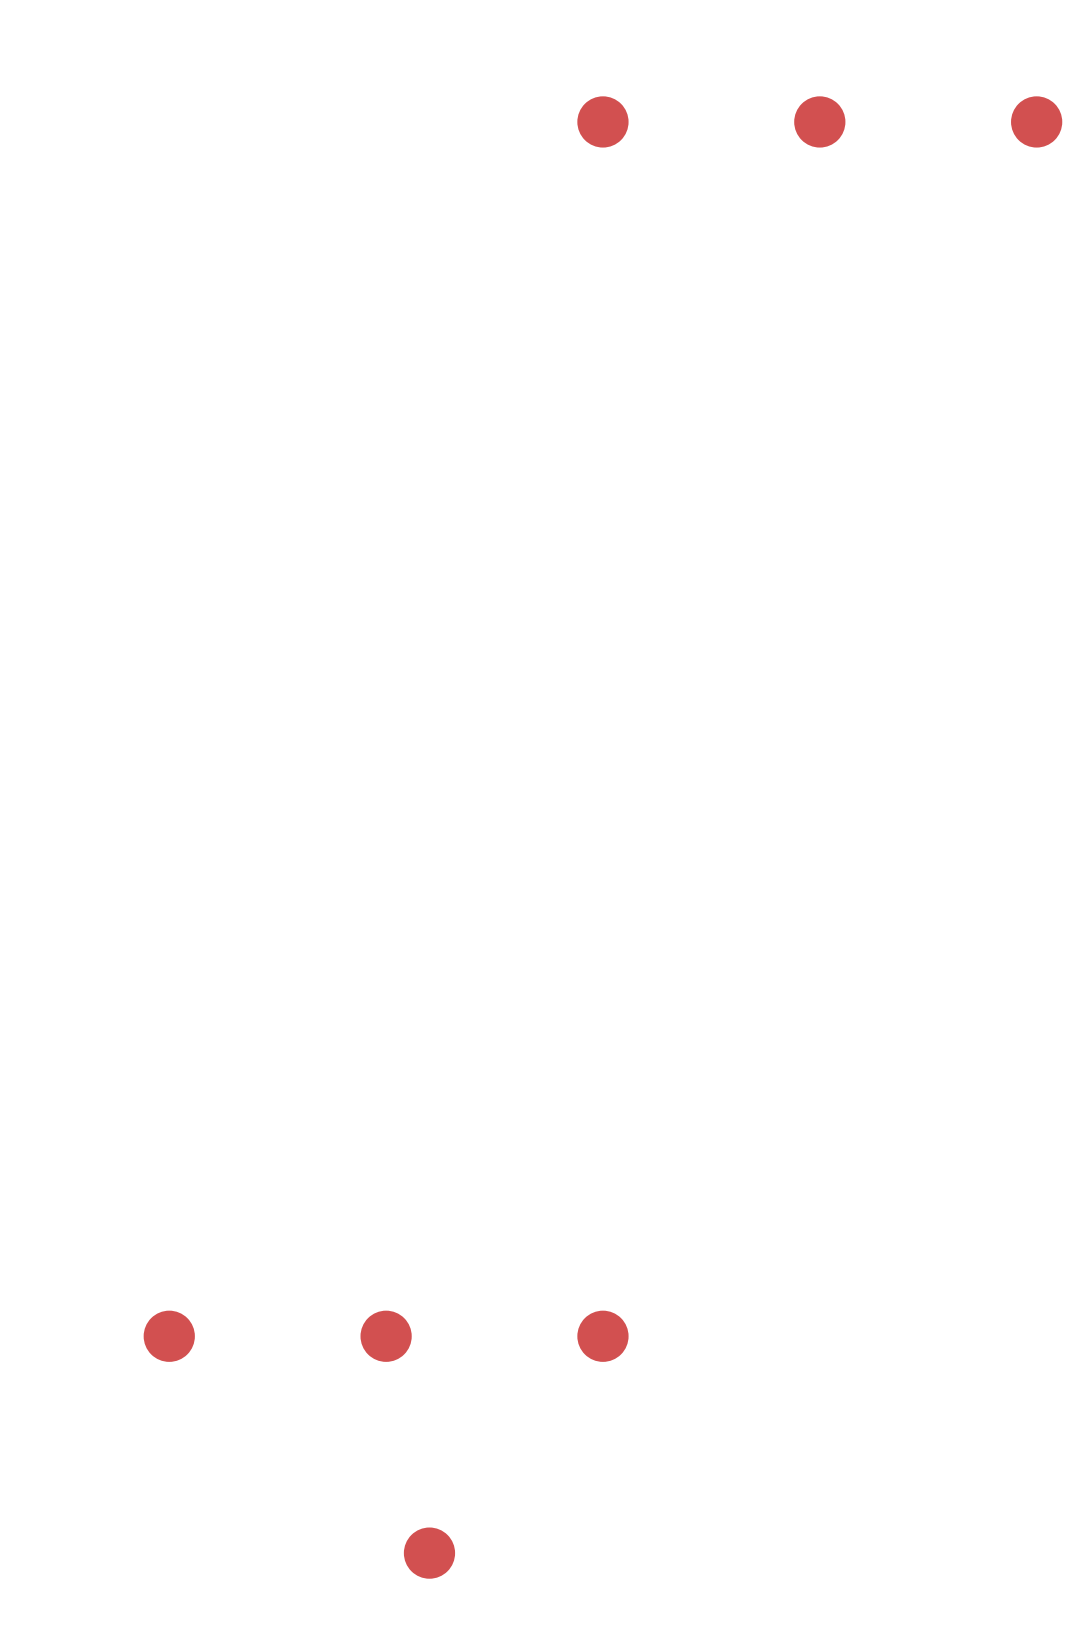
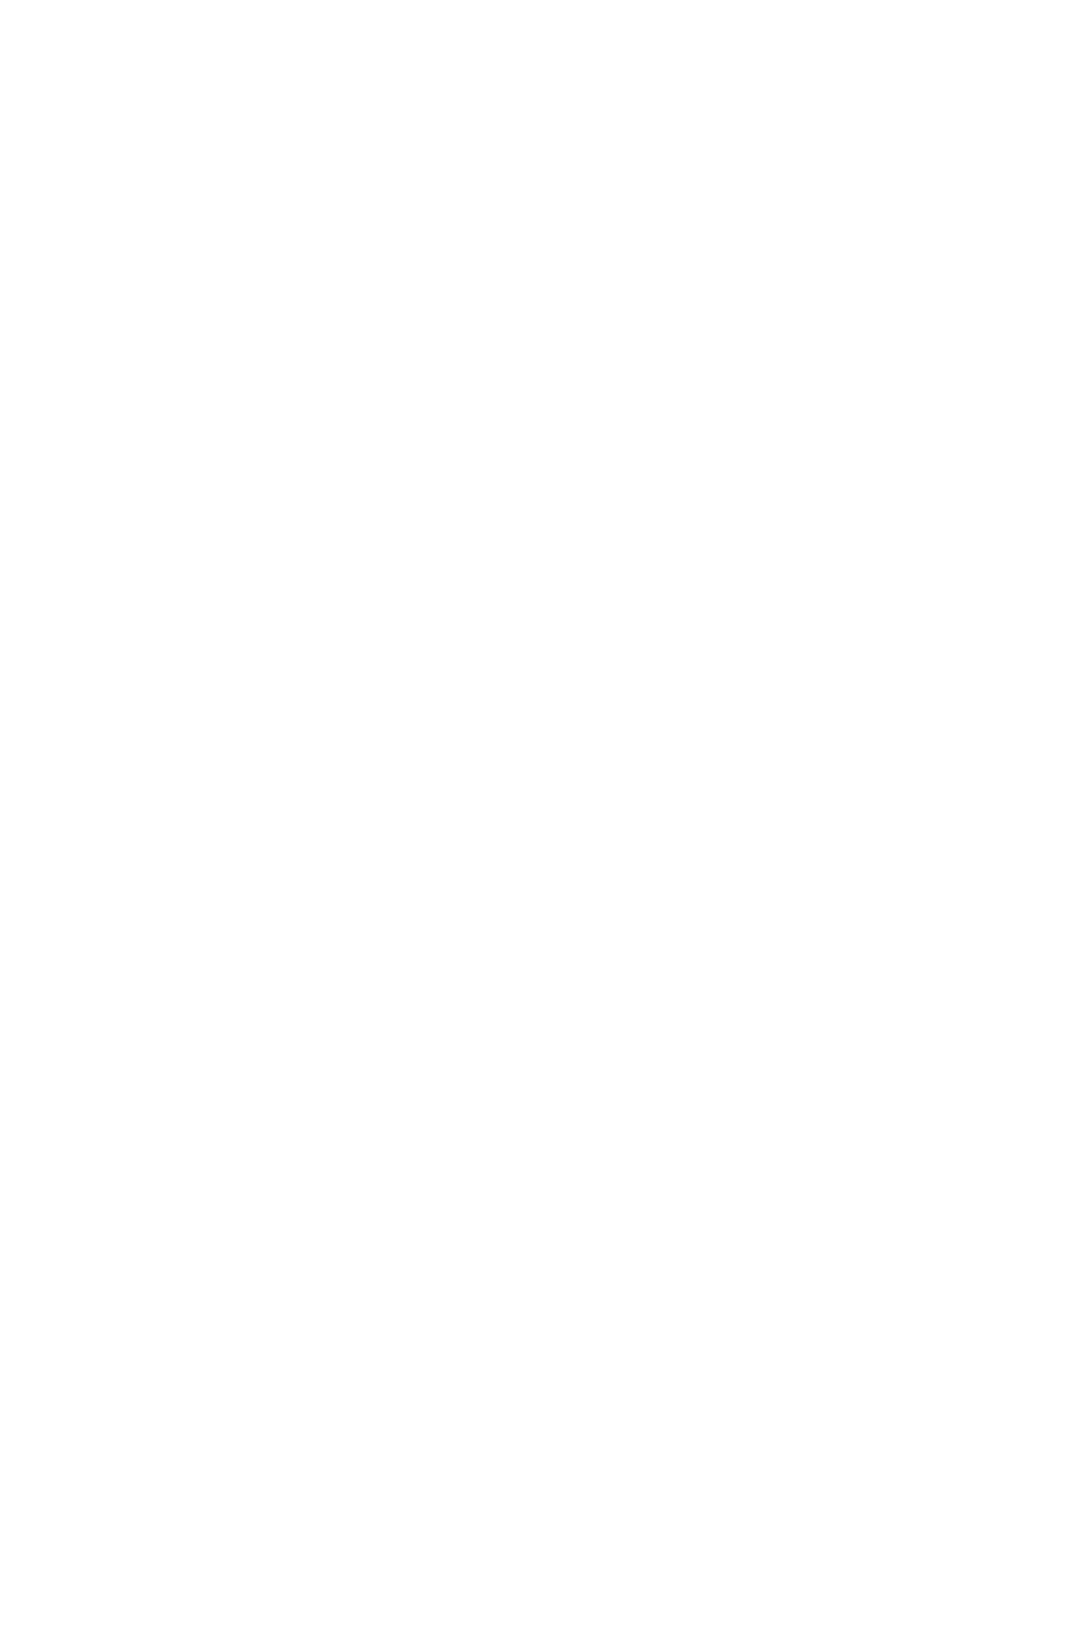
part: (602, 121) -> none
part: (819, 121) -> none
part: (1036, 121) -> none
part: (169, 1336) -> none
part: (386, 1336) -> none
part: (602, 1336) -> none
part: (429, 1553) -> none

